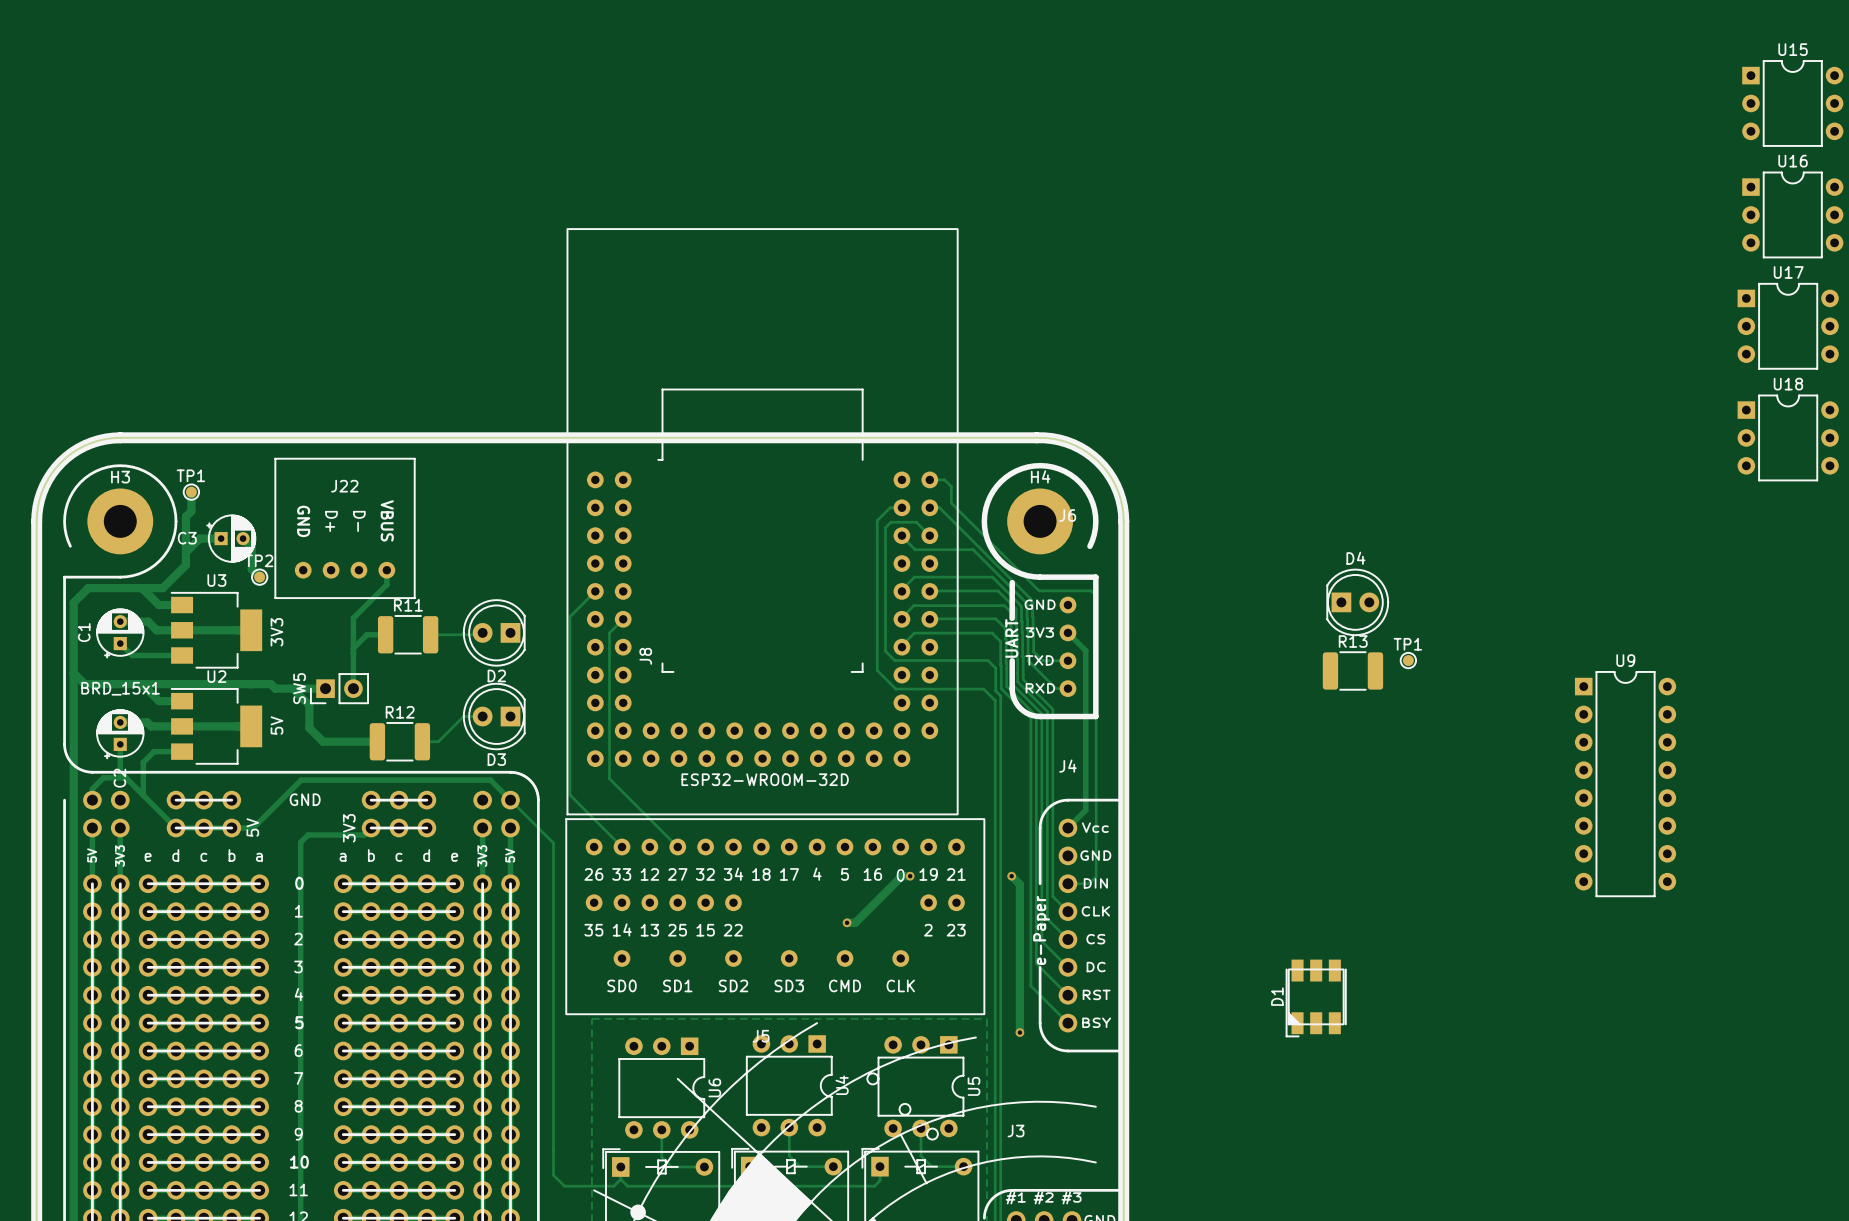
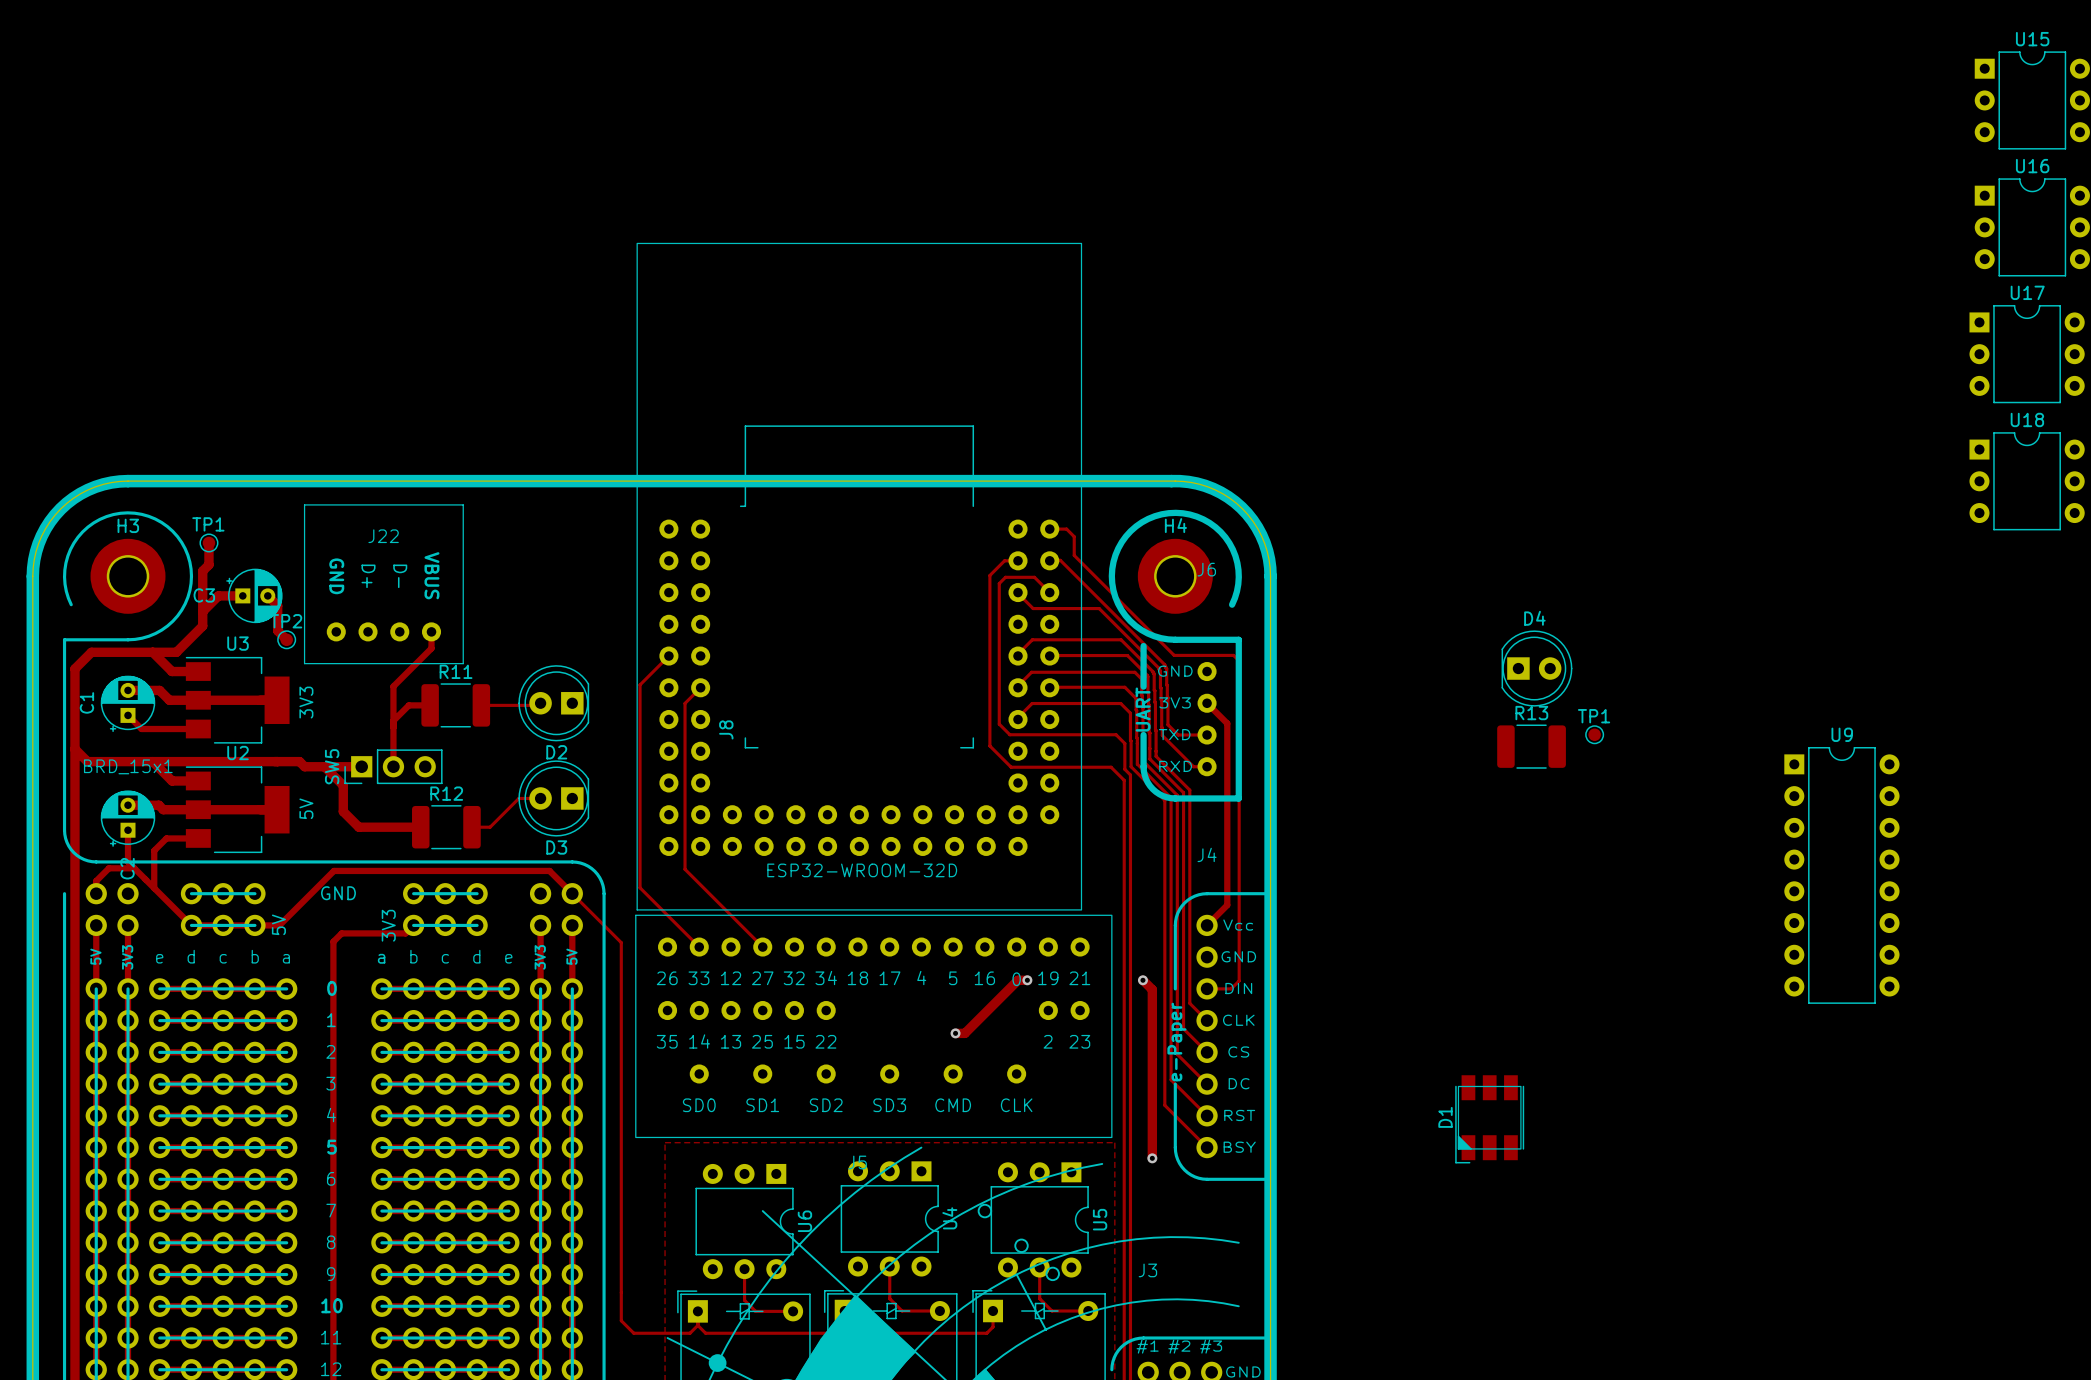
SW5 footprint: [310, 673, 369, 704] -> [344, 749, 443, 785]

